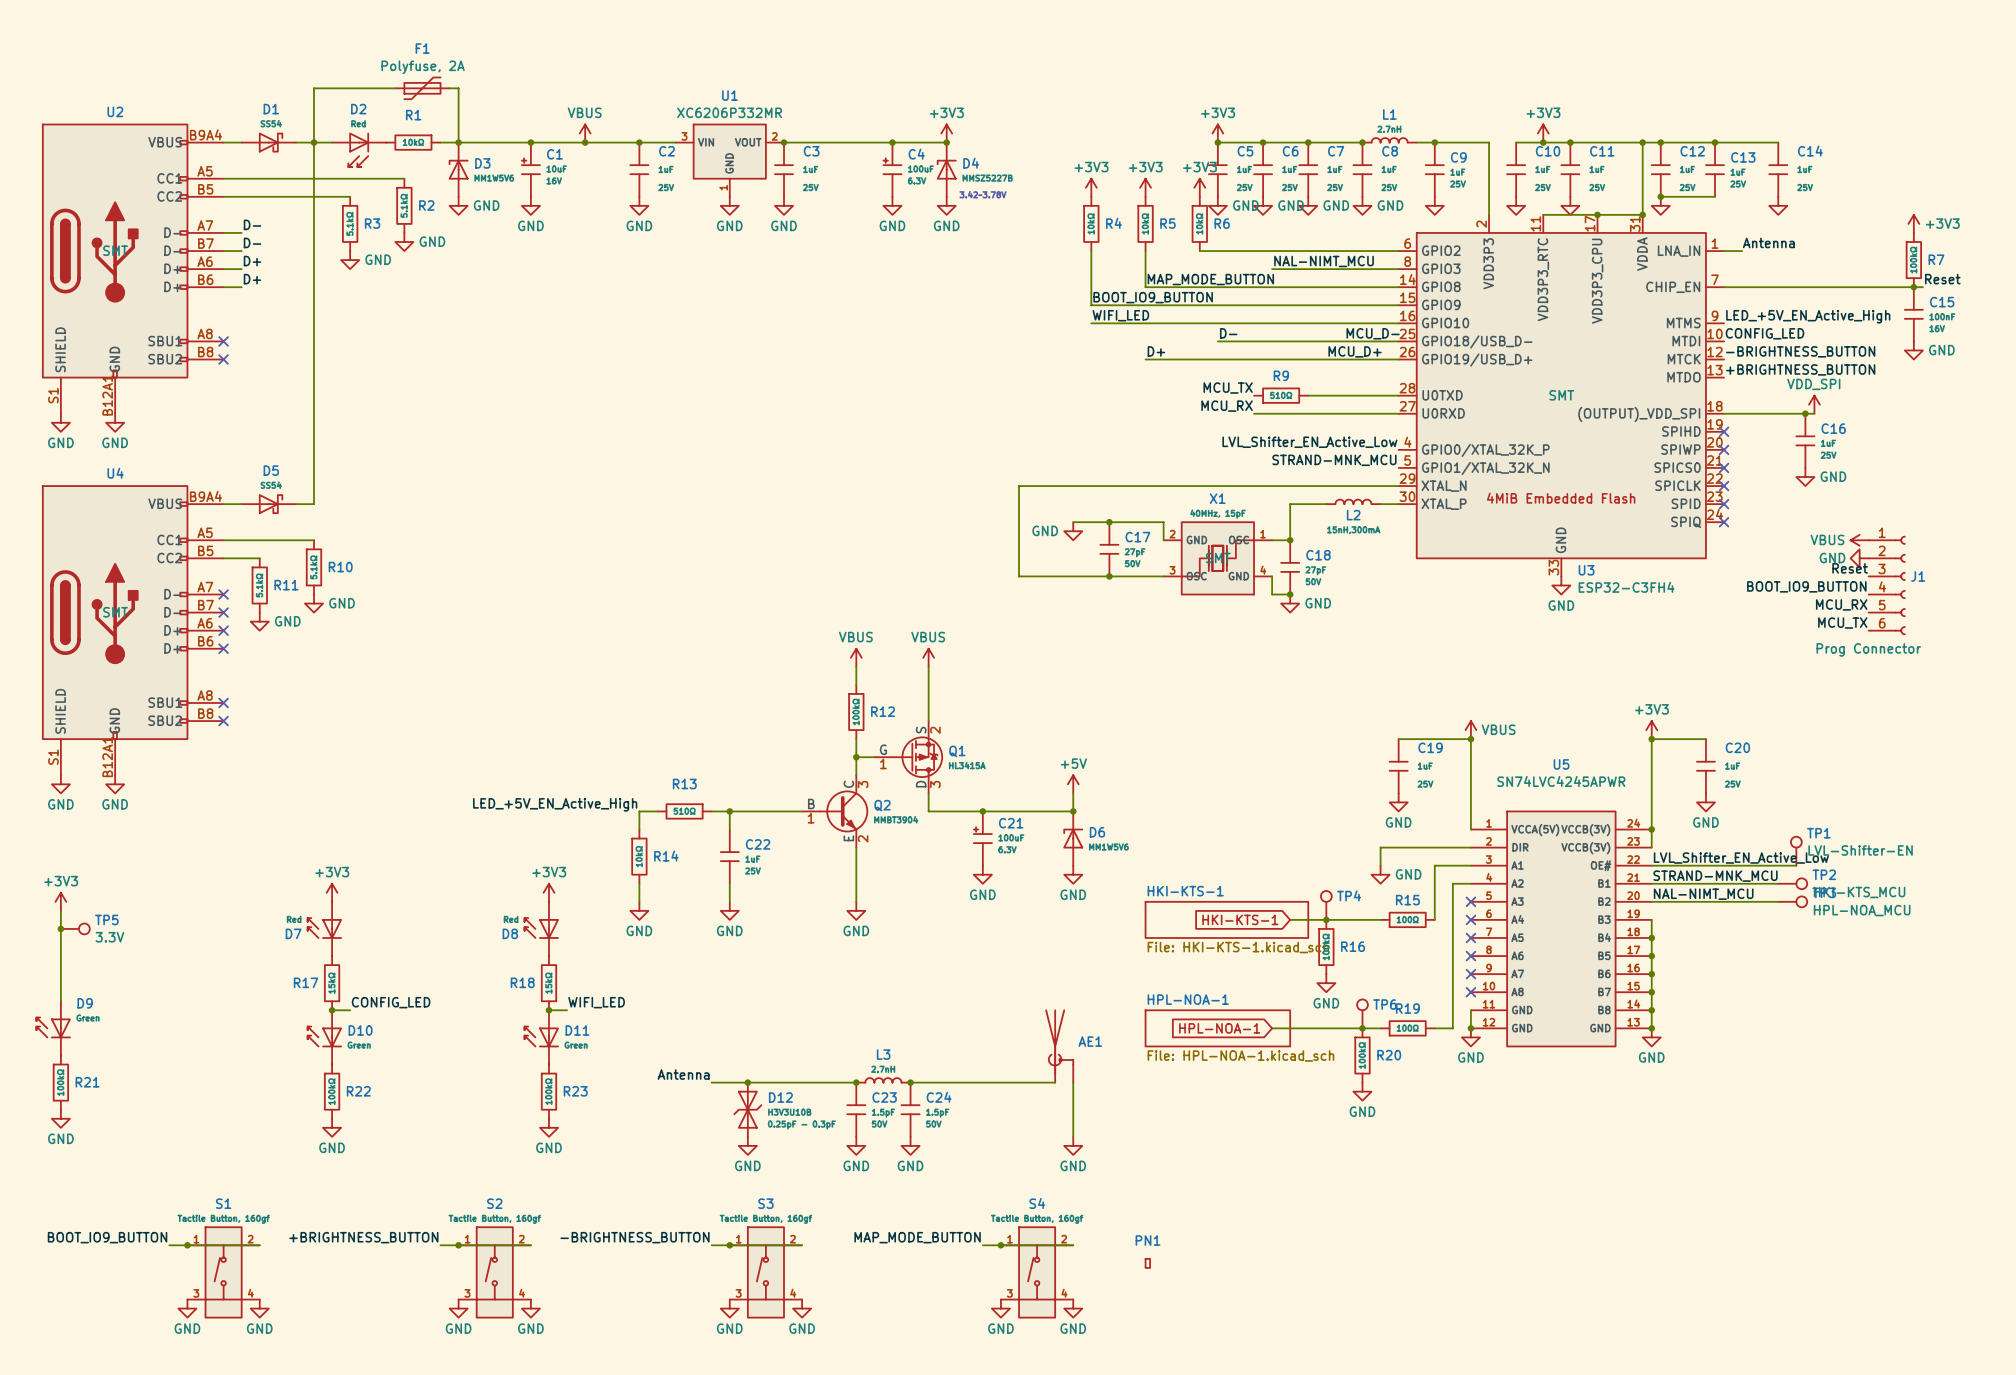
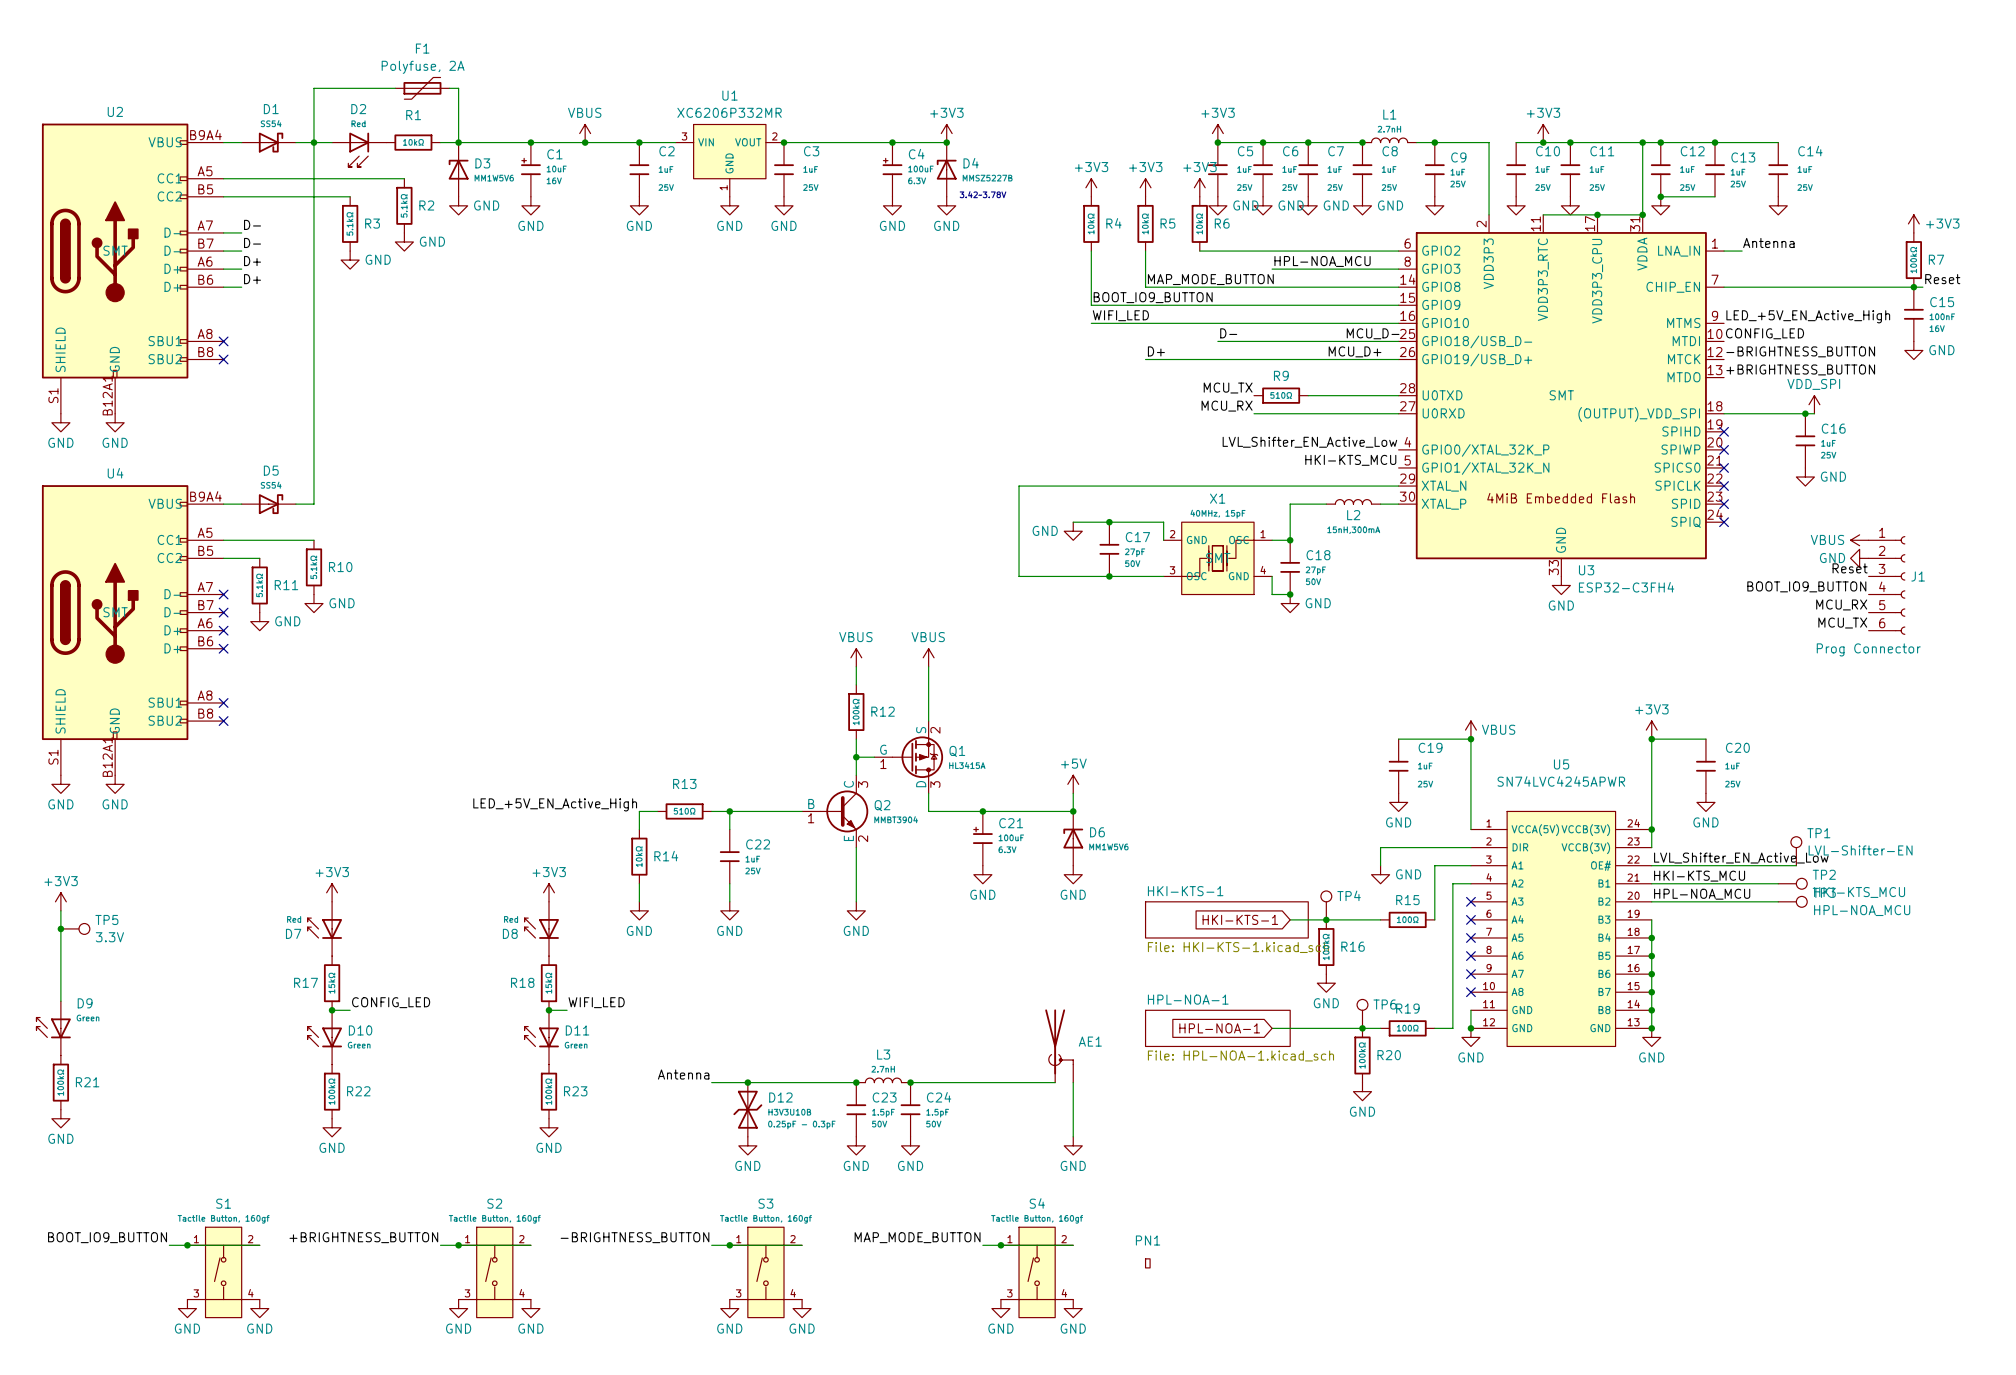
label: NAL-NIMT_MCU (1324, 261) -> HPL-NOA_MCU (1322, 261)
label: STRAND-MNK_MCU (1334, 460) -> HKI-KTS_MCU (1350, 460)
label: STRAND-MNK_MCU (1715, 876) -> HKI-KTS_MCU (1699, 876)
label: NAL-NIMT_MCU (1703, 894) -> HPL-NOA_MCU (1702, 894)

